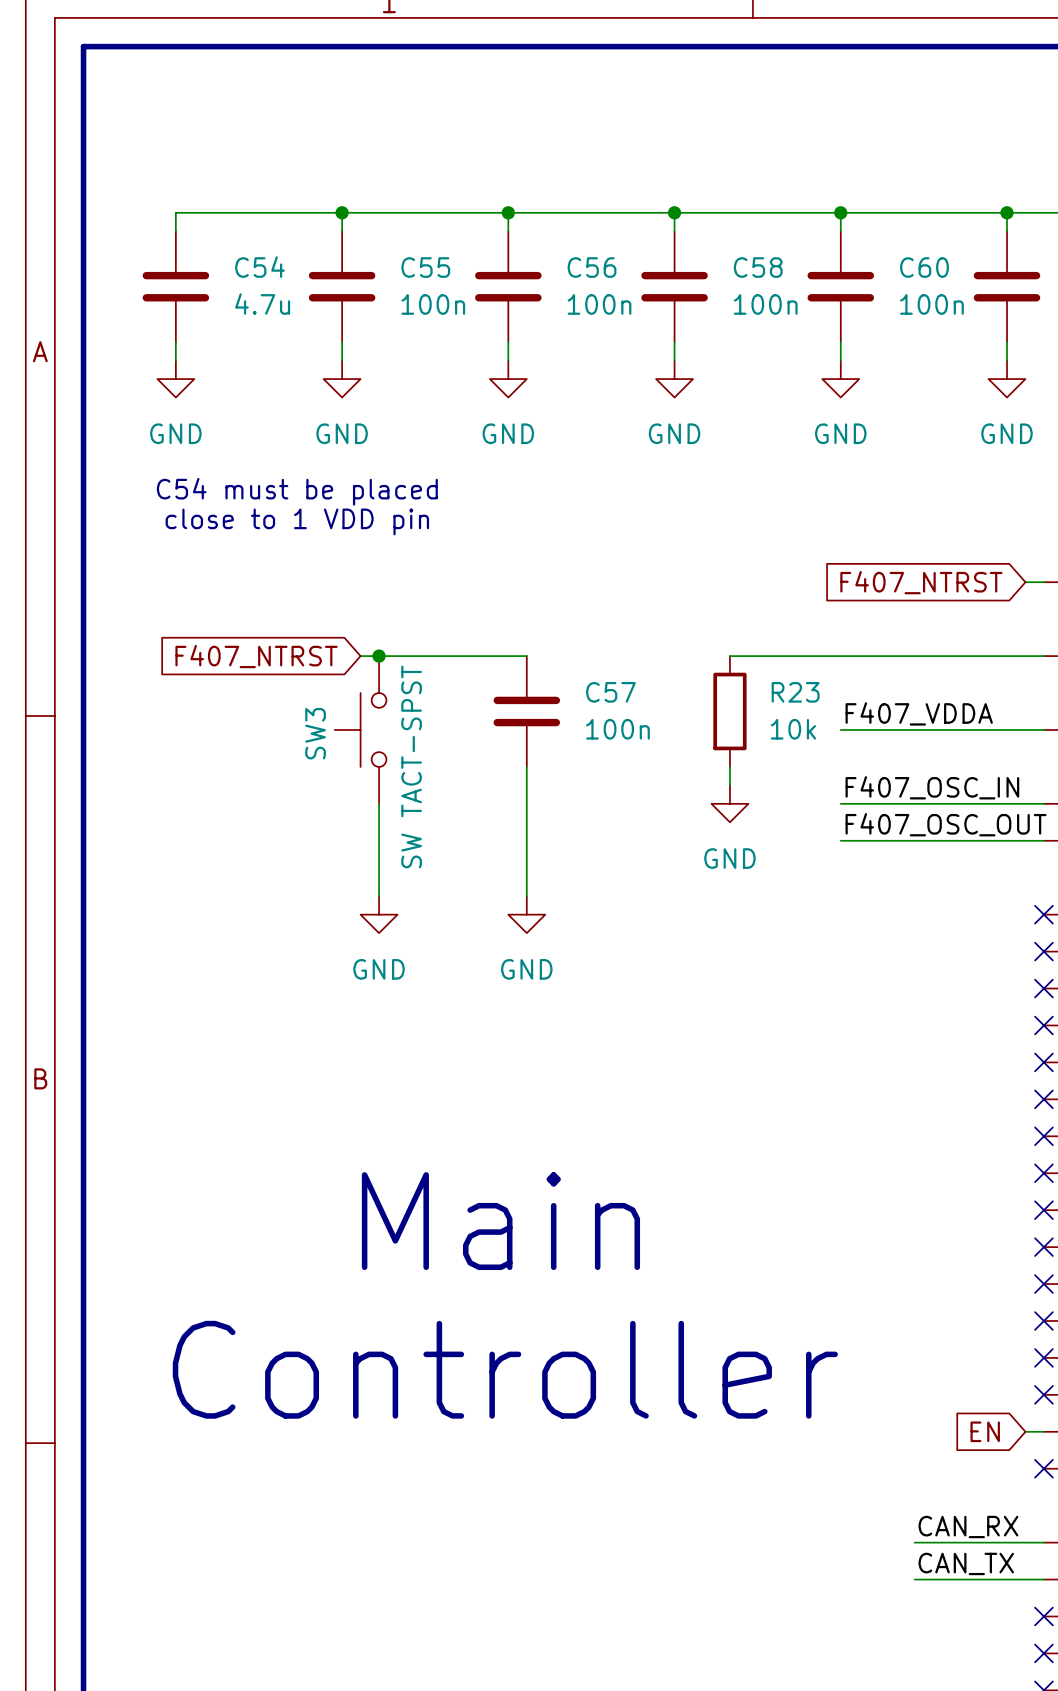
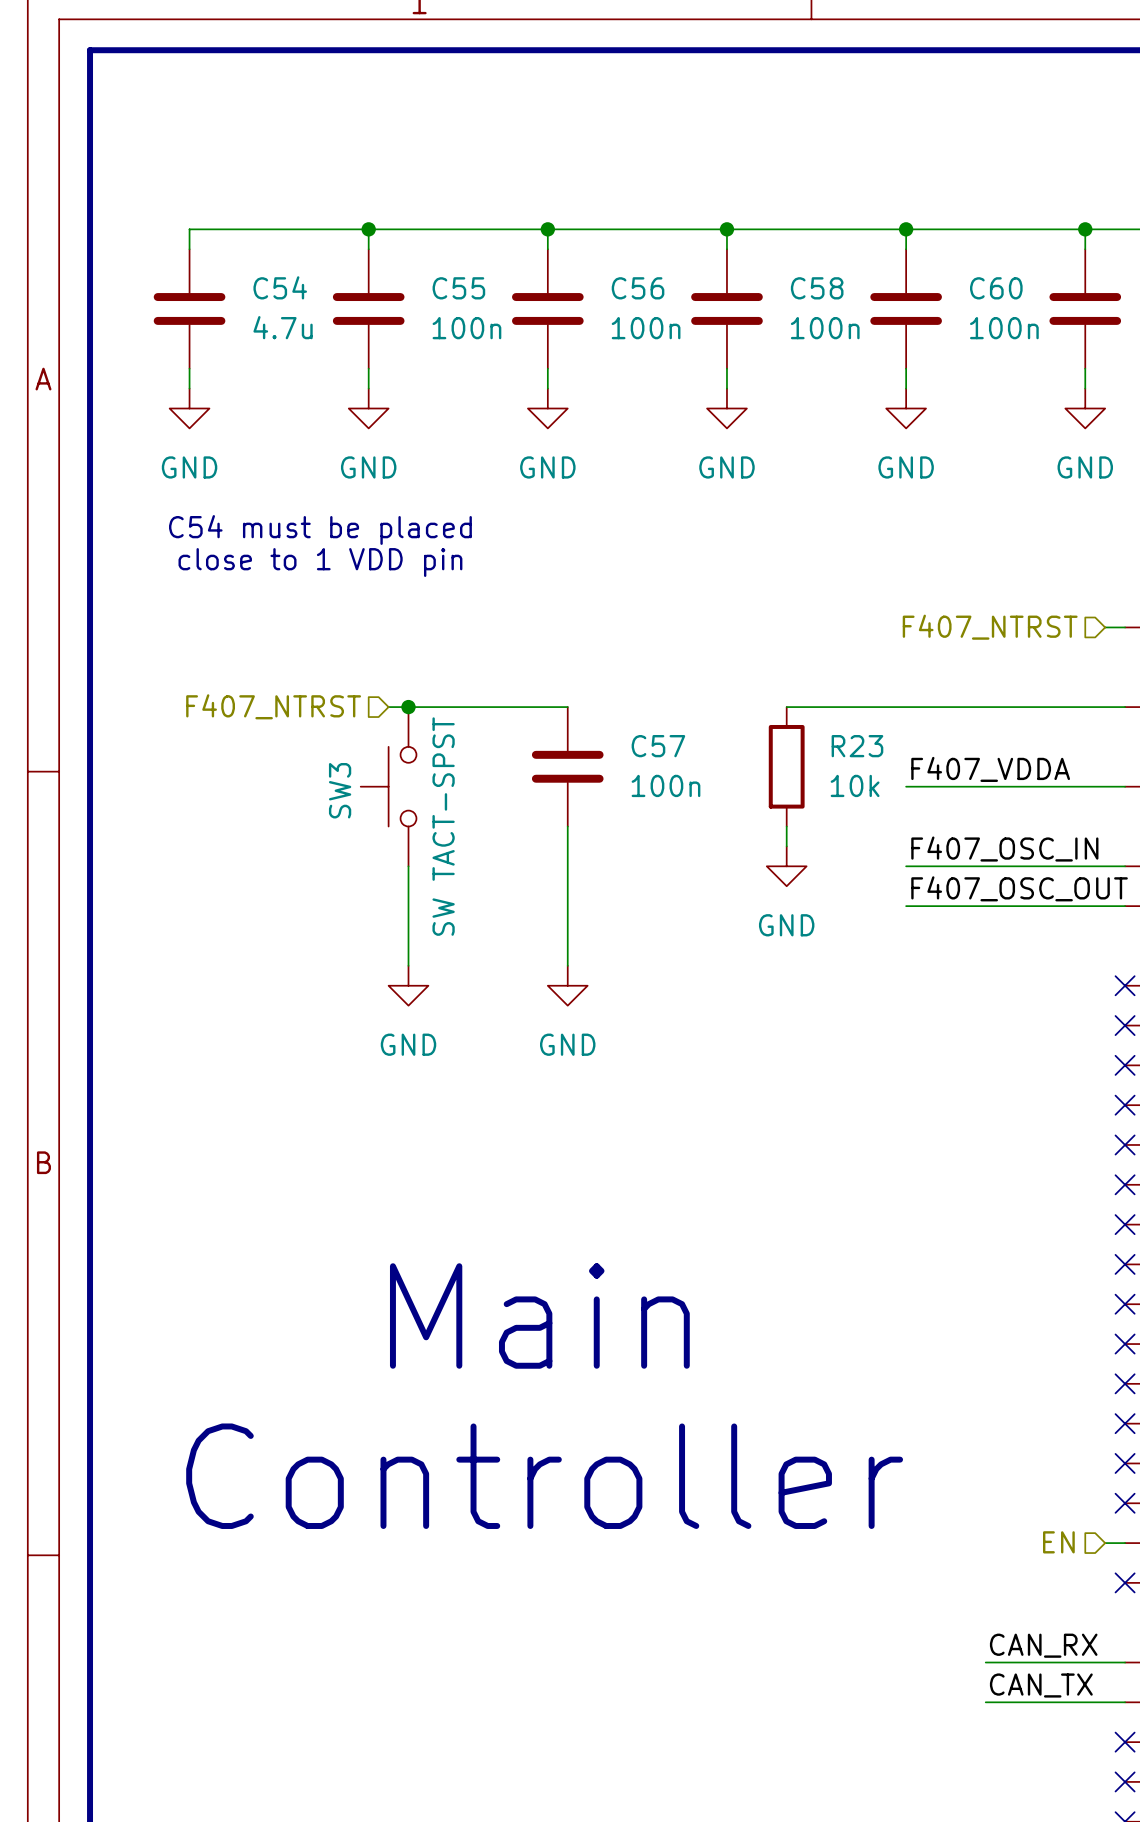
hierarchical label: none -> F407_NTRST (990, 627)
global label: F407_NTRST (921, 582) -> none
hierarchical label: none -> F407_NTRST (273, 706)
global label: F407_NTRST (256, 656) -> none
hierarchical label: none -> EN (1058, 1542)
global label: EN (985, 1431) -> none

